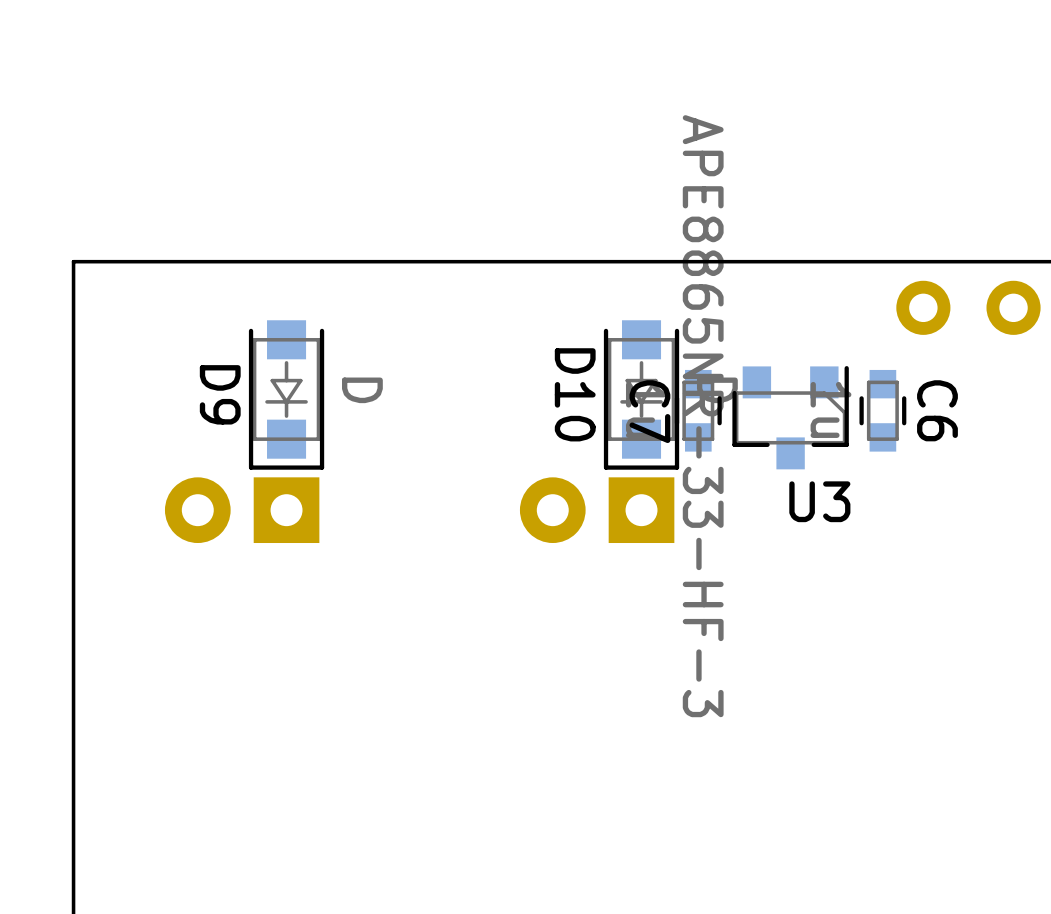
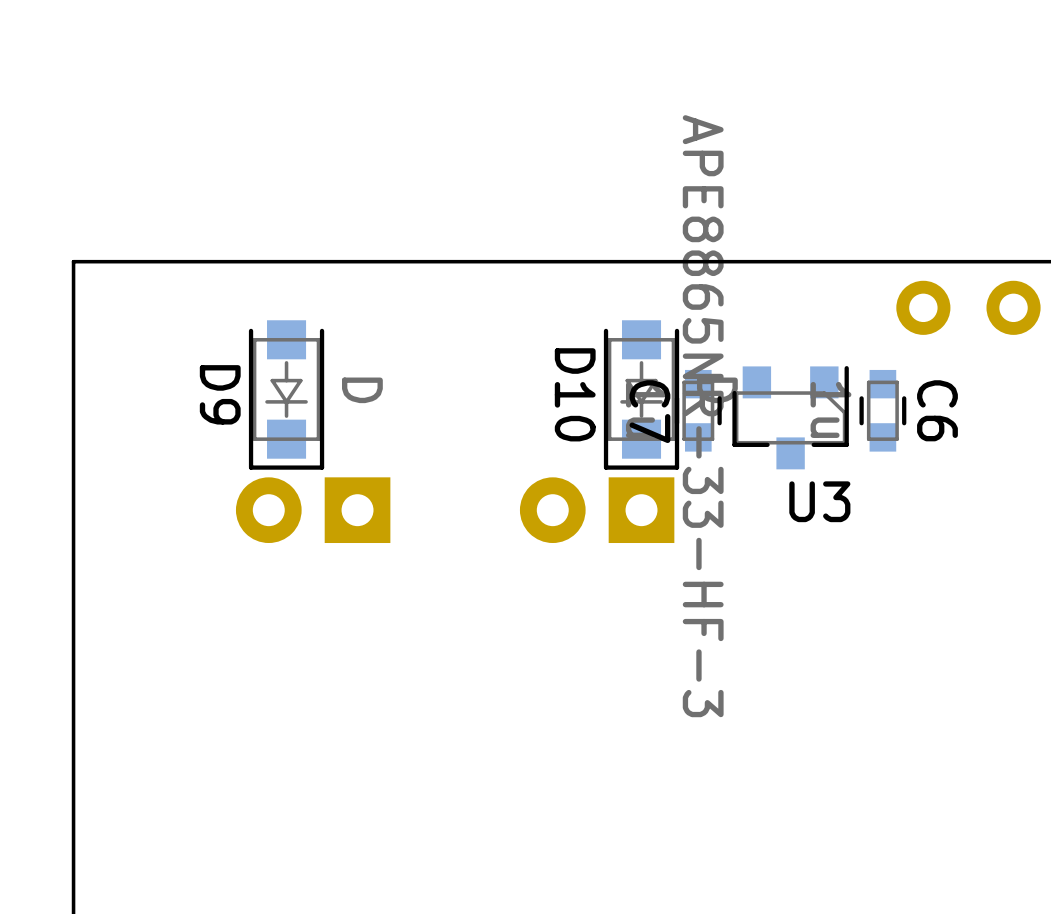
part position: (242, 510) -> (313, 510)

